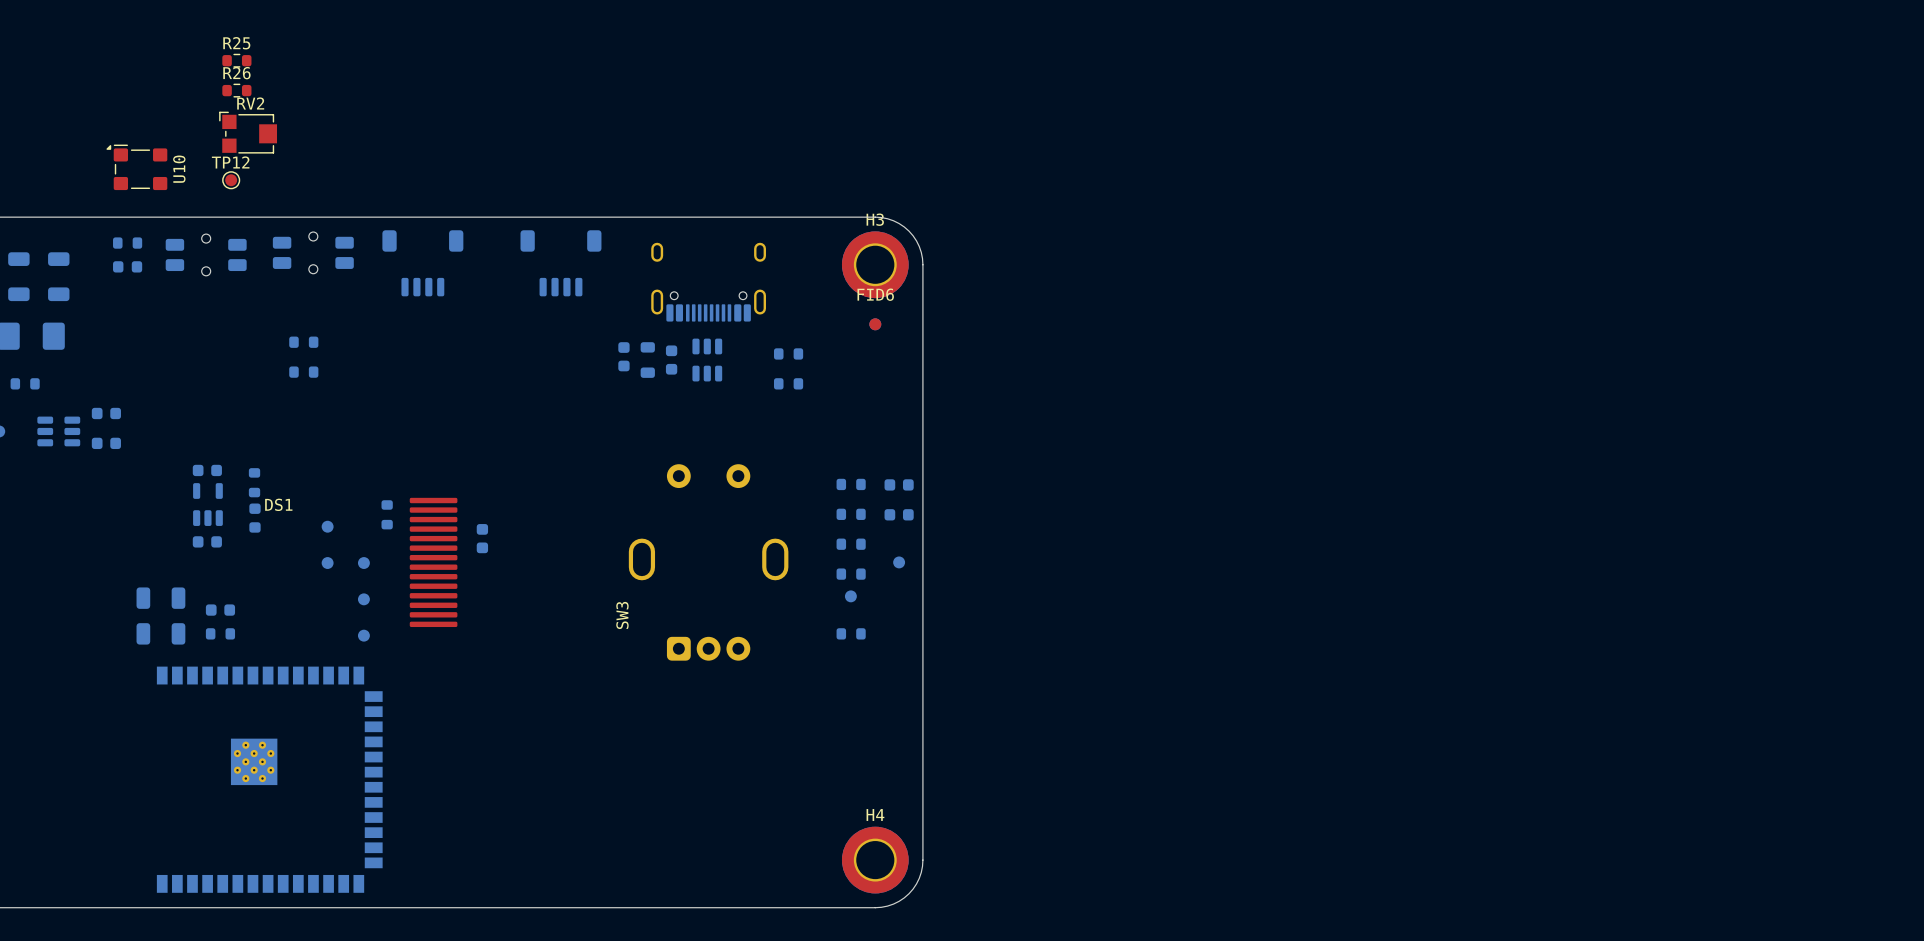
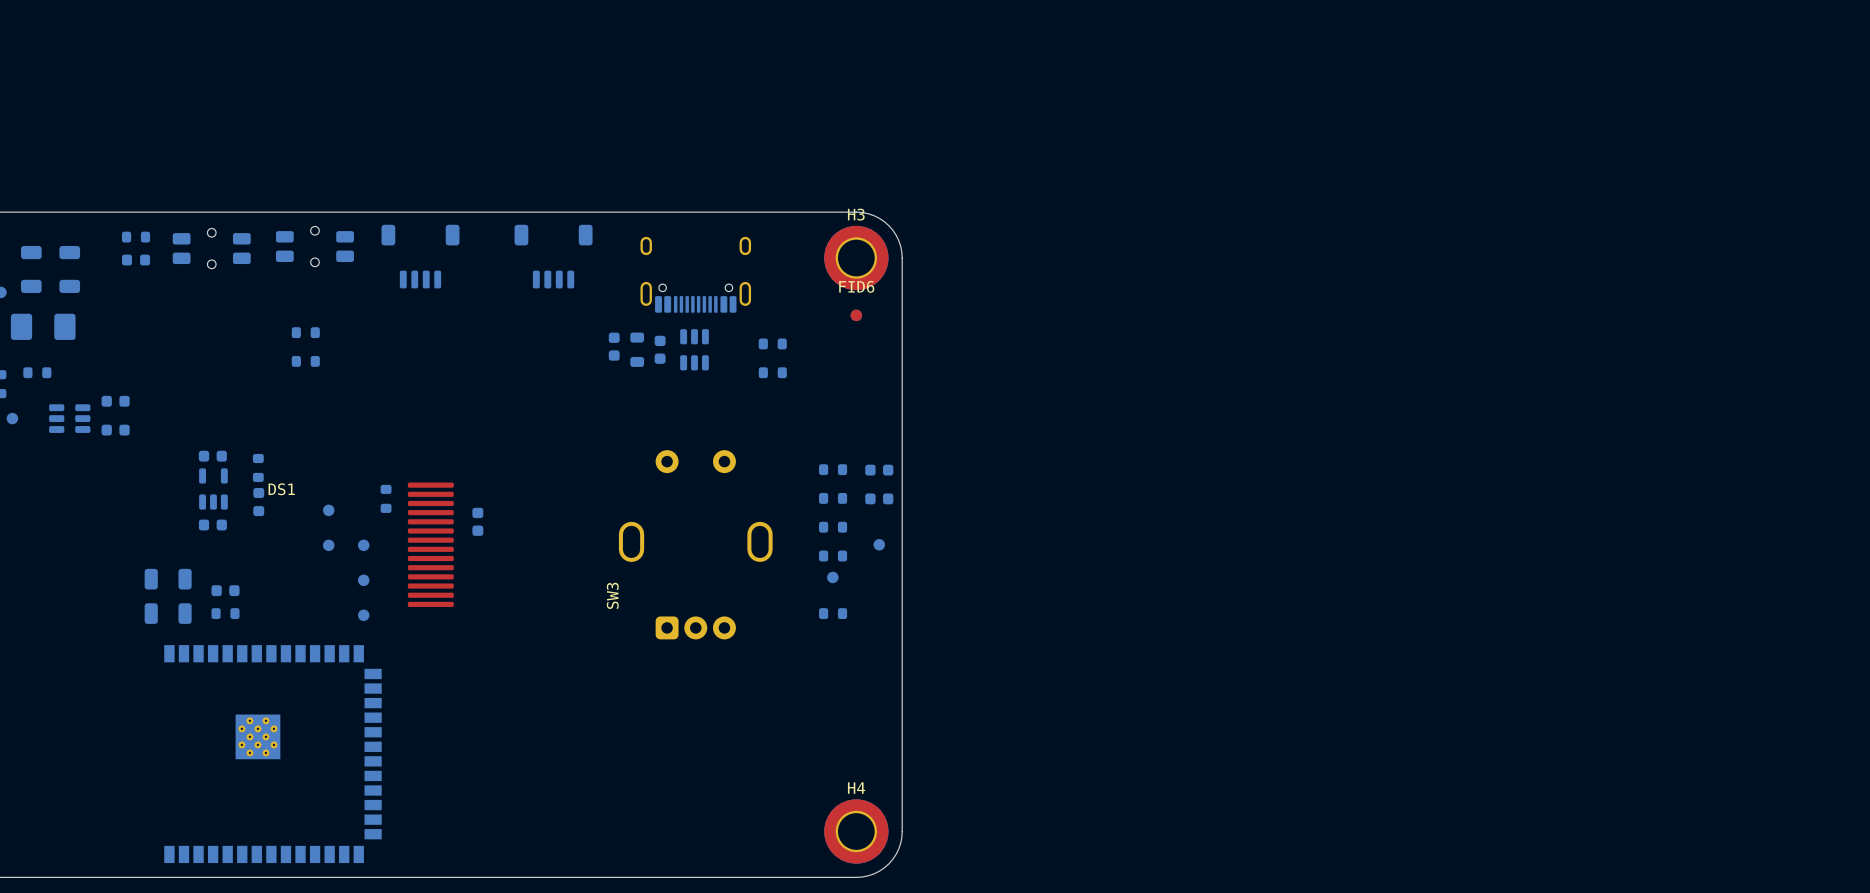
R25: (236, 60) -> none
R26: (236, 90) -> none
RV2: (248, 132) -> none
U10: (136, 167) -> none
TP12: (231, 180) -> none

